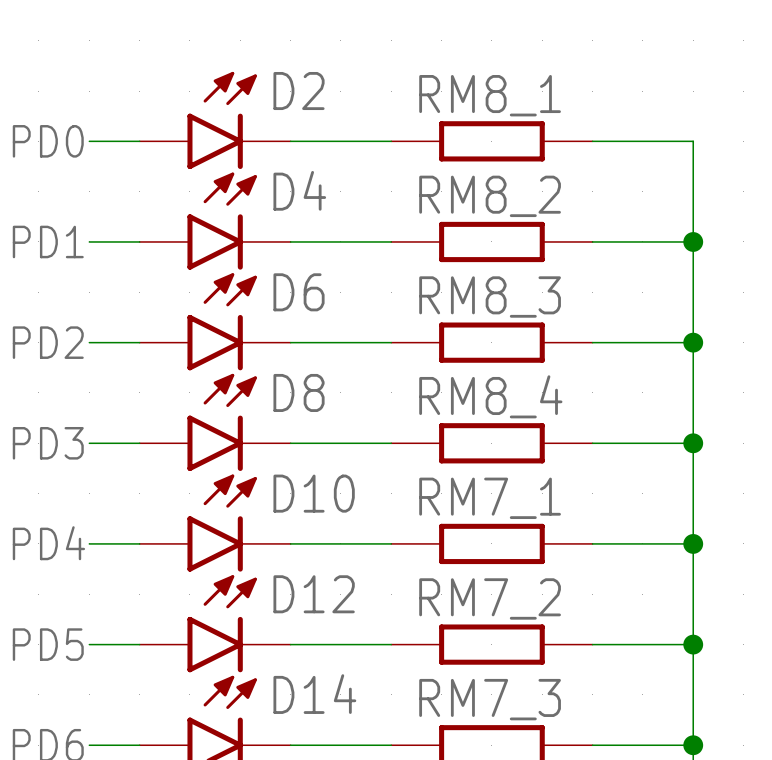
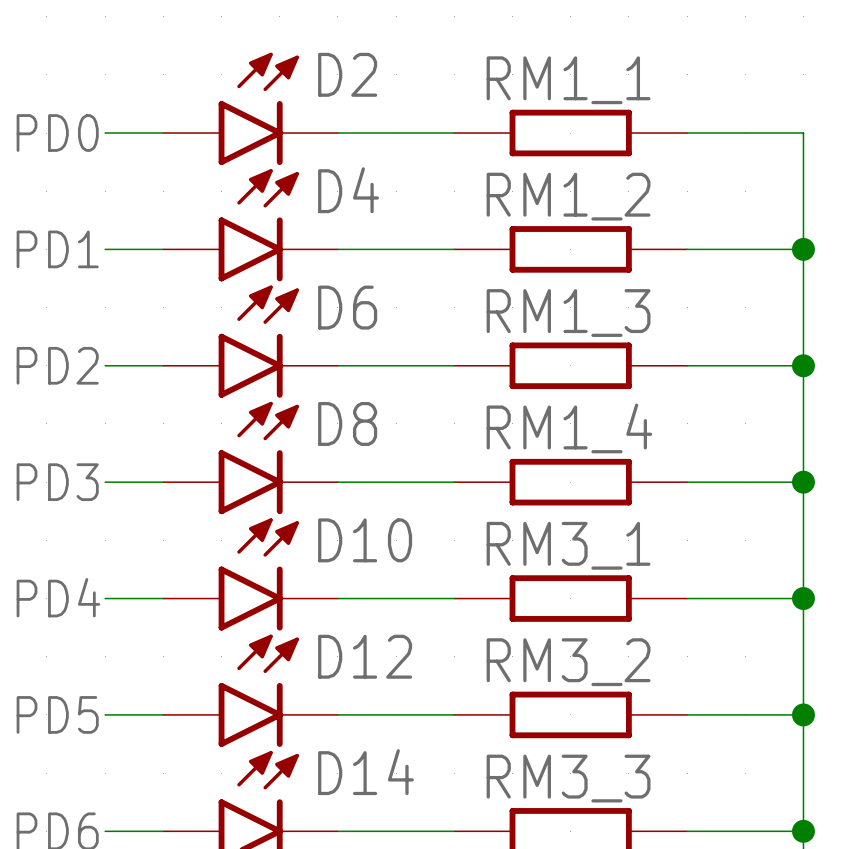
RM8_1 name: RM8_1 (490, 95) -> RM1_1 (568, 80)
RM8_2 name: RM8_2 (490, 196) -> RM1_2 (568, 196)
RM8_3 name: RM8_3 (490, 297) -> RM1_3 (568, 313)
RM8_4 name: RM8_4 (490, 396) -> RM1_4 (569, 428)
RM7_1 name: RM7_1 (490, 498) -> RM3_1 (568, 545)
RM7_2 name: RM7_2 (490, 598) -> RM3_2 (568, 662)
RM7_3 name: RM7_3 (490, 699) -> RM3_3 (568, 778)

